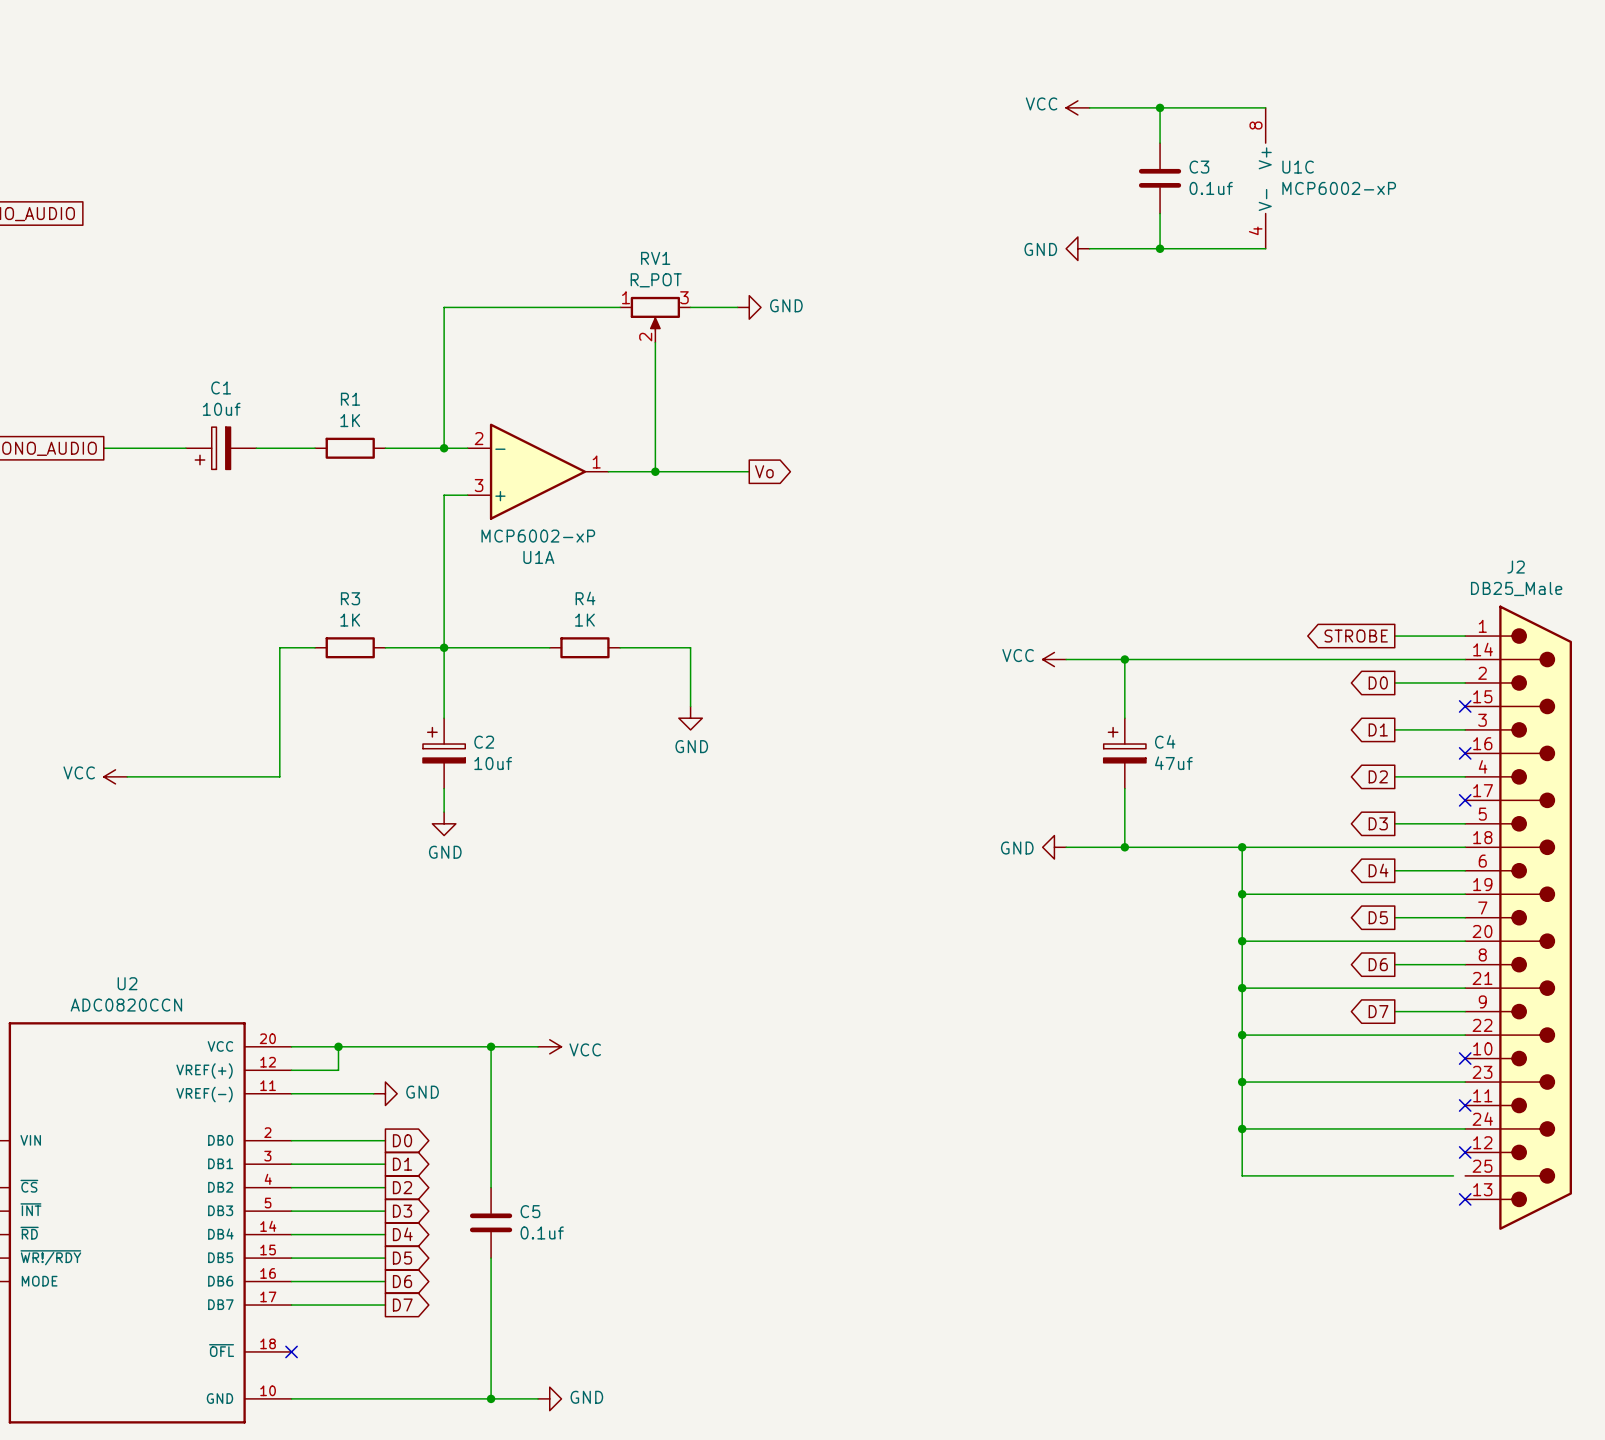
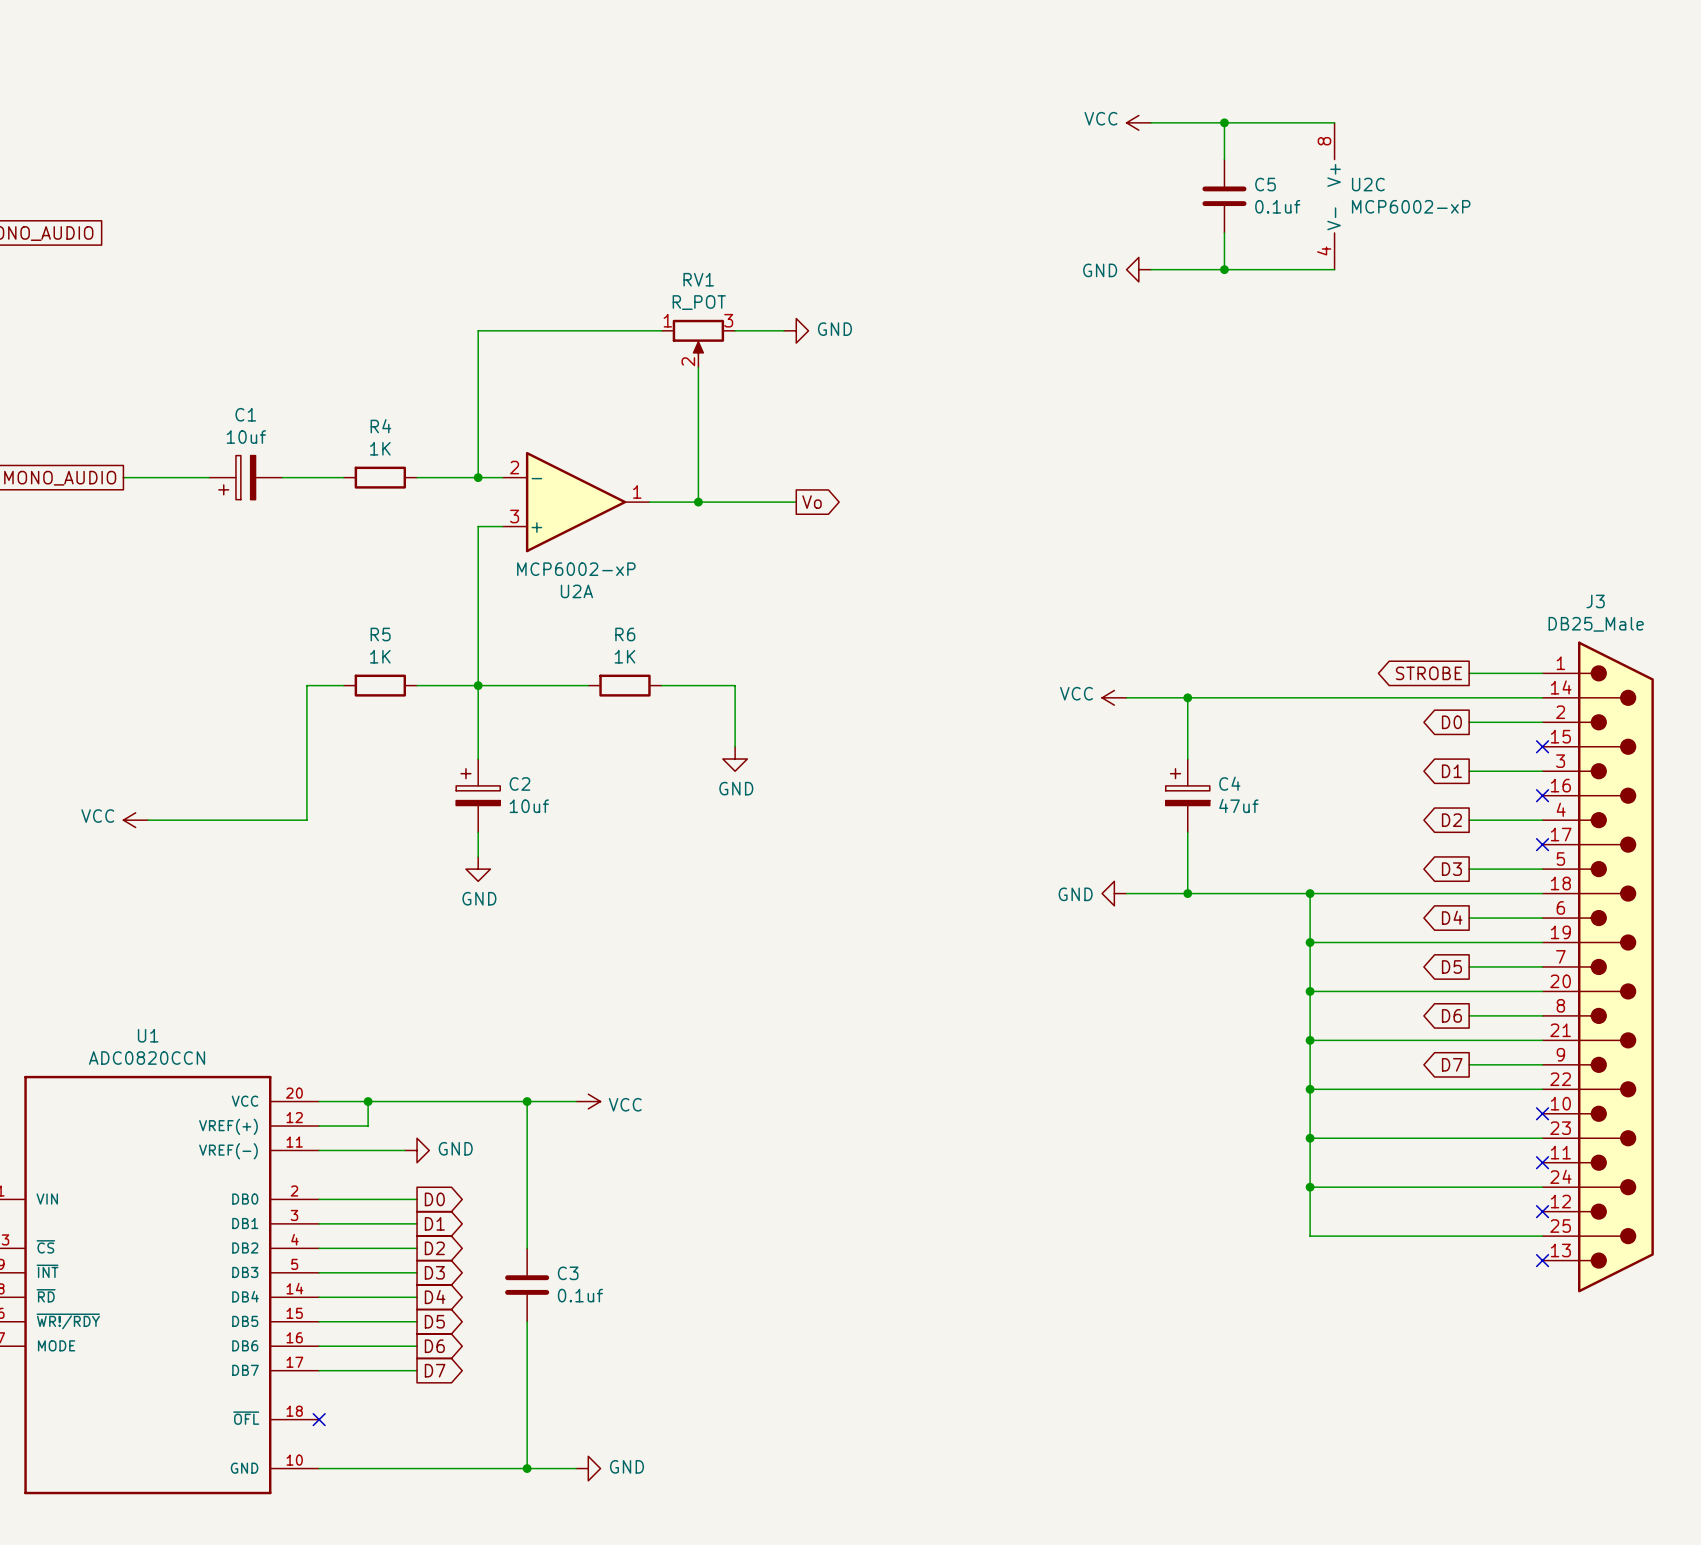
C3 name: C3 (1199, 167) -> C5 (1265, 184)
U1C name: U1C (1298, 167) -> U2C (1368, 184)
R1 name: R1 (350, 399) -> R4 (380, 426)
U1A name: U1A (538, 557) -> U2A (576, 591)
J2 name: J2 (1516, 567) -> J3 (1595, 601)
R3 name: R3 (350, 598) -> R5 (380, 634)
R4 name: R4 (585, 598) -> R6 (625, 634)
U2 name: U2 (127, 983) -> U1 (148, 1035)
wire: none -> (1530, 1236) (1542, 1236)
C5 name: C5 (530, 1211) -> C3 (568, 1273)

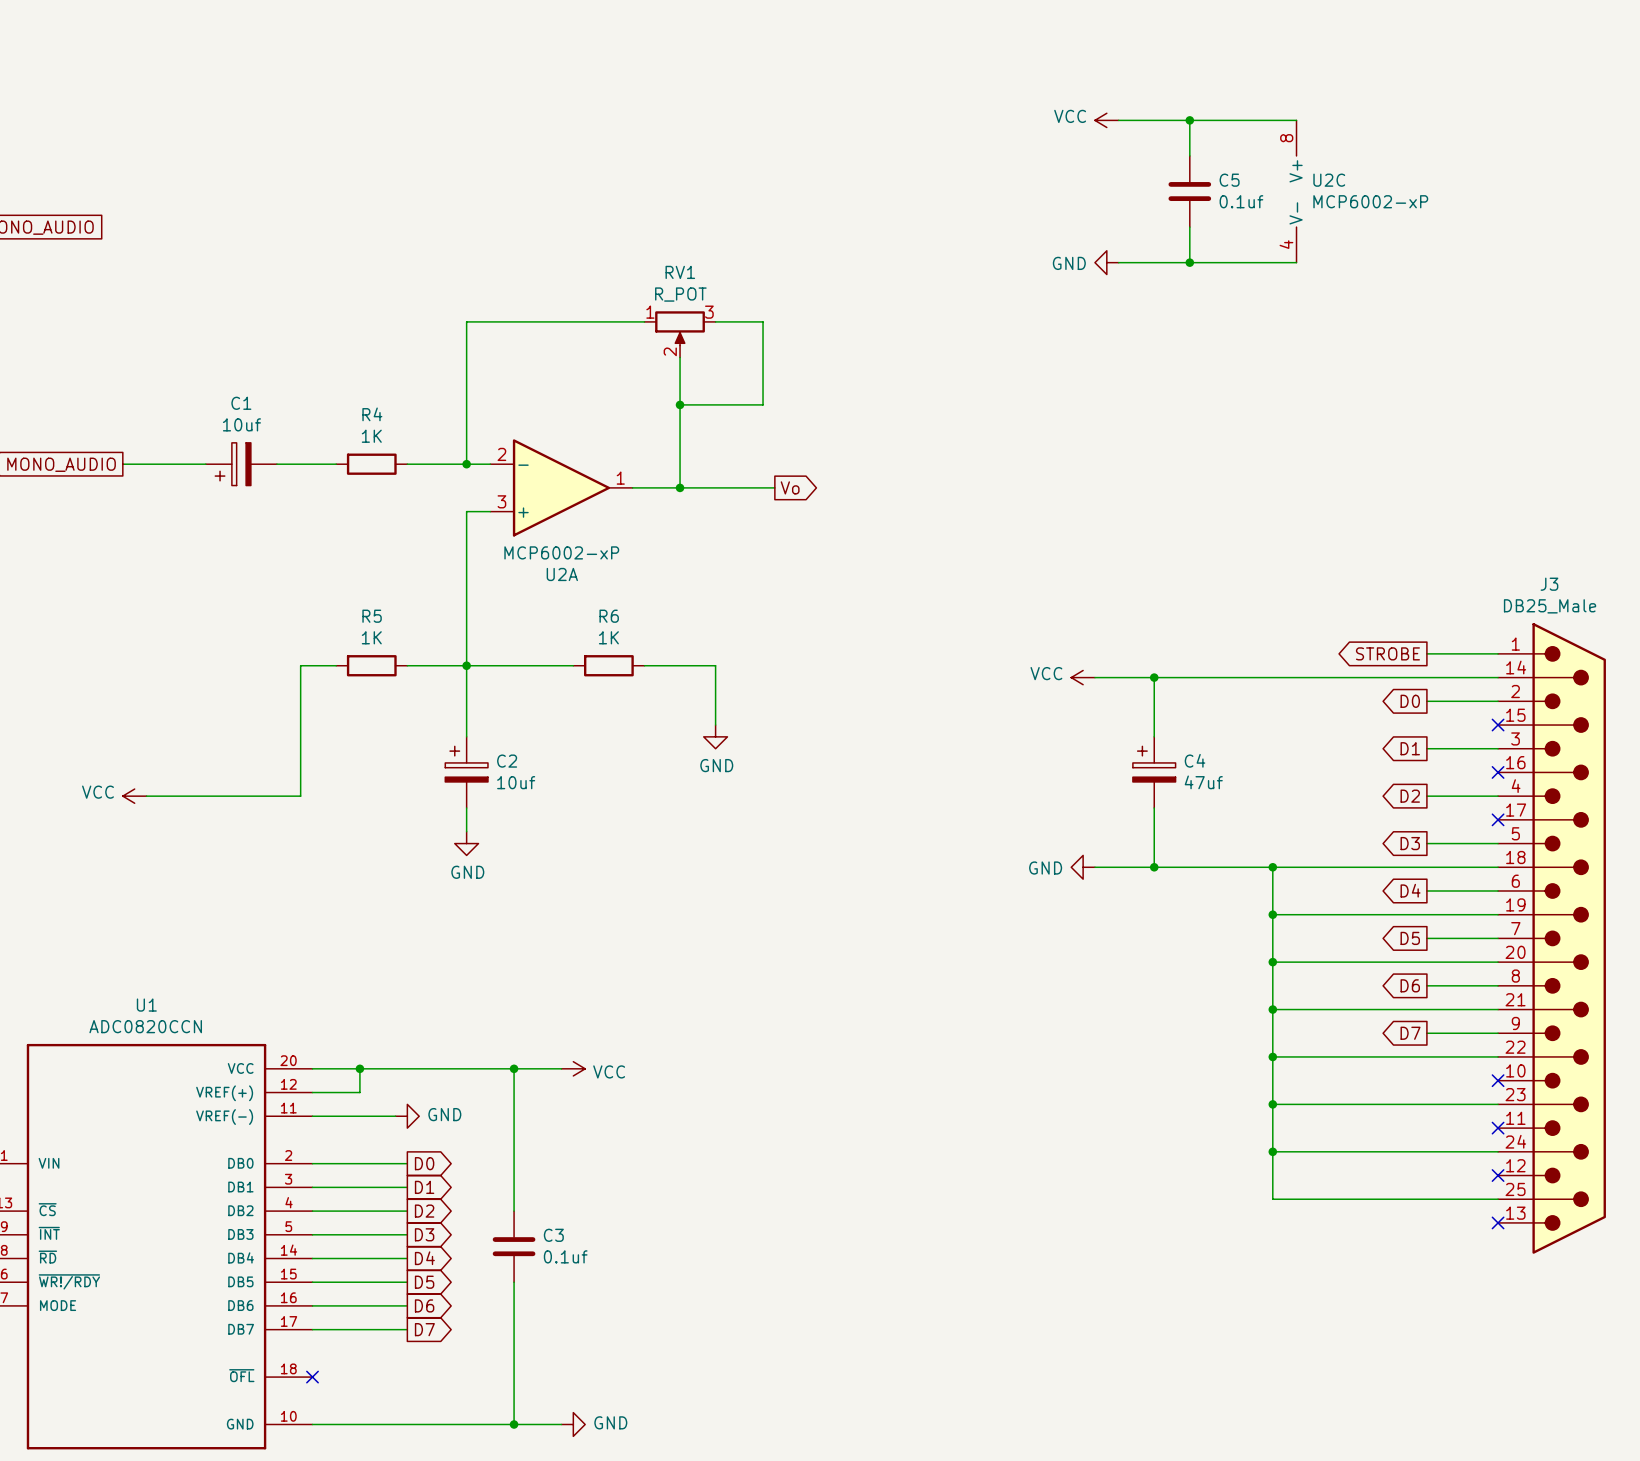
wire: none -> (763, 321) (763, 404) (680, 404)
power symbol: GND (796, 330) -> none
junction: none -> (680, 404)

